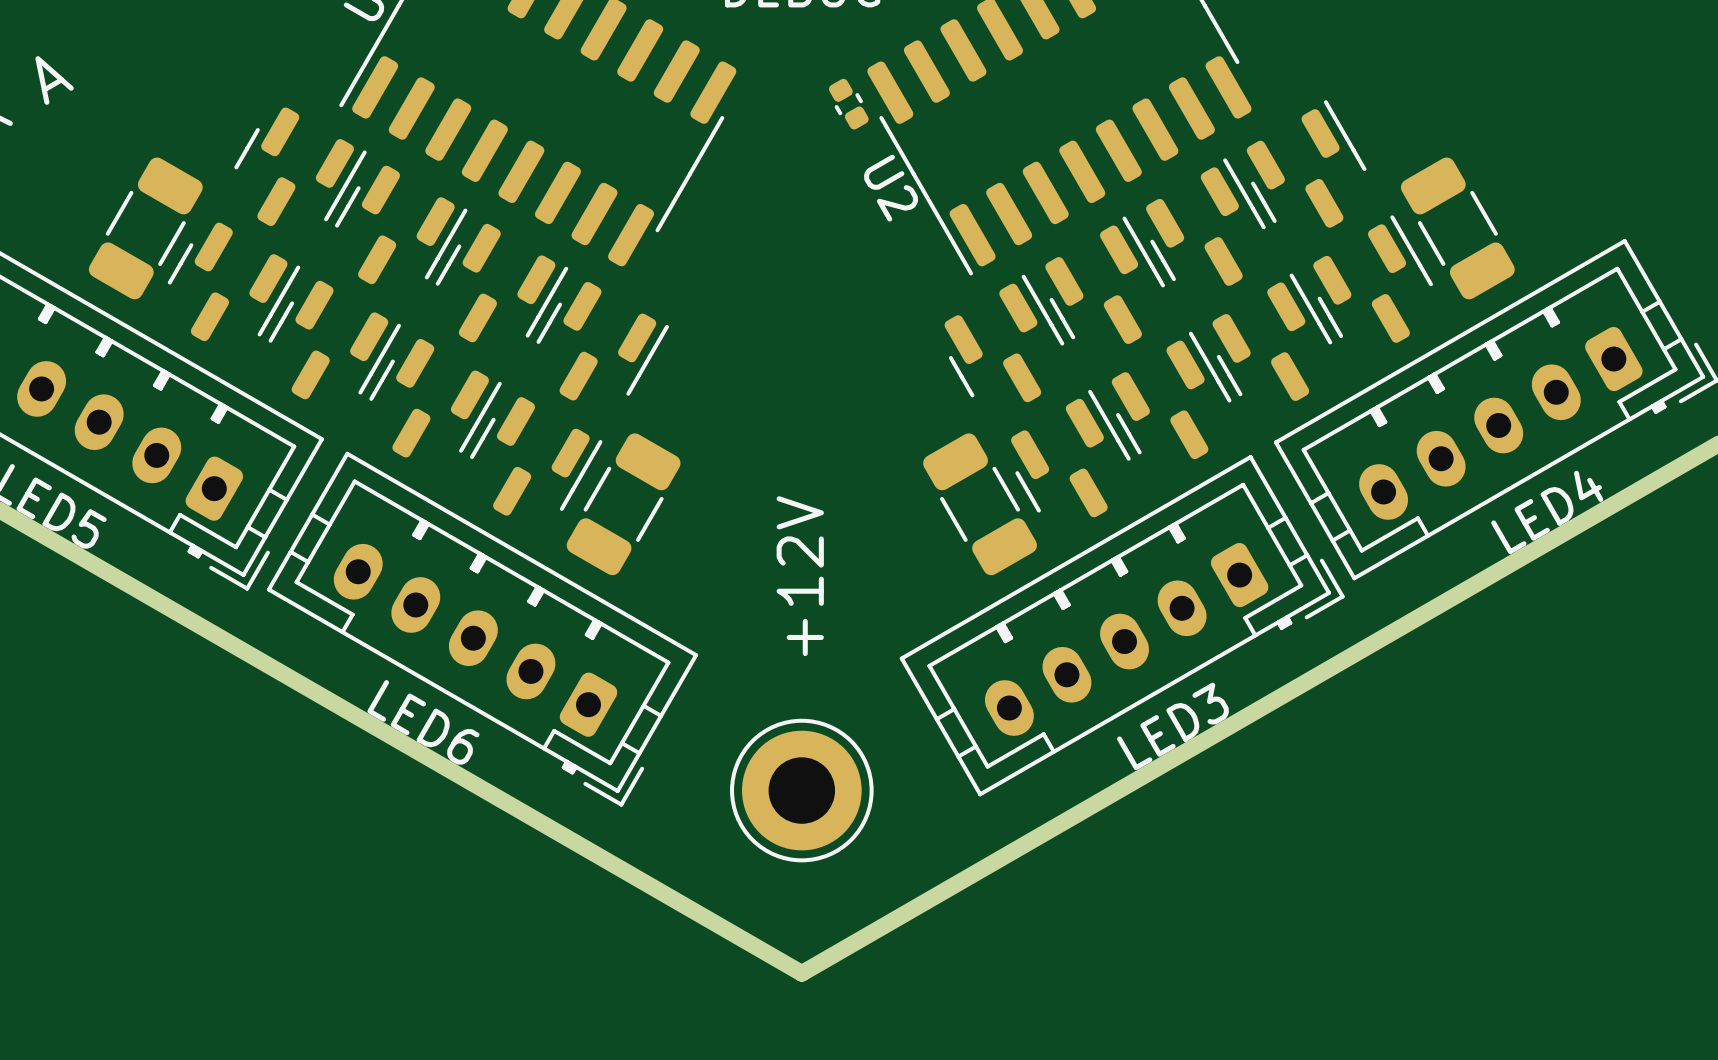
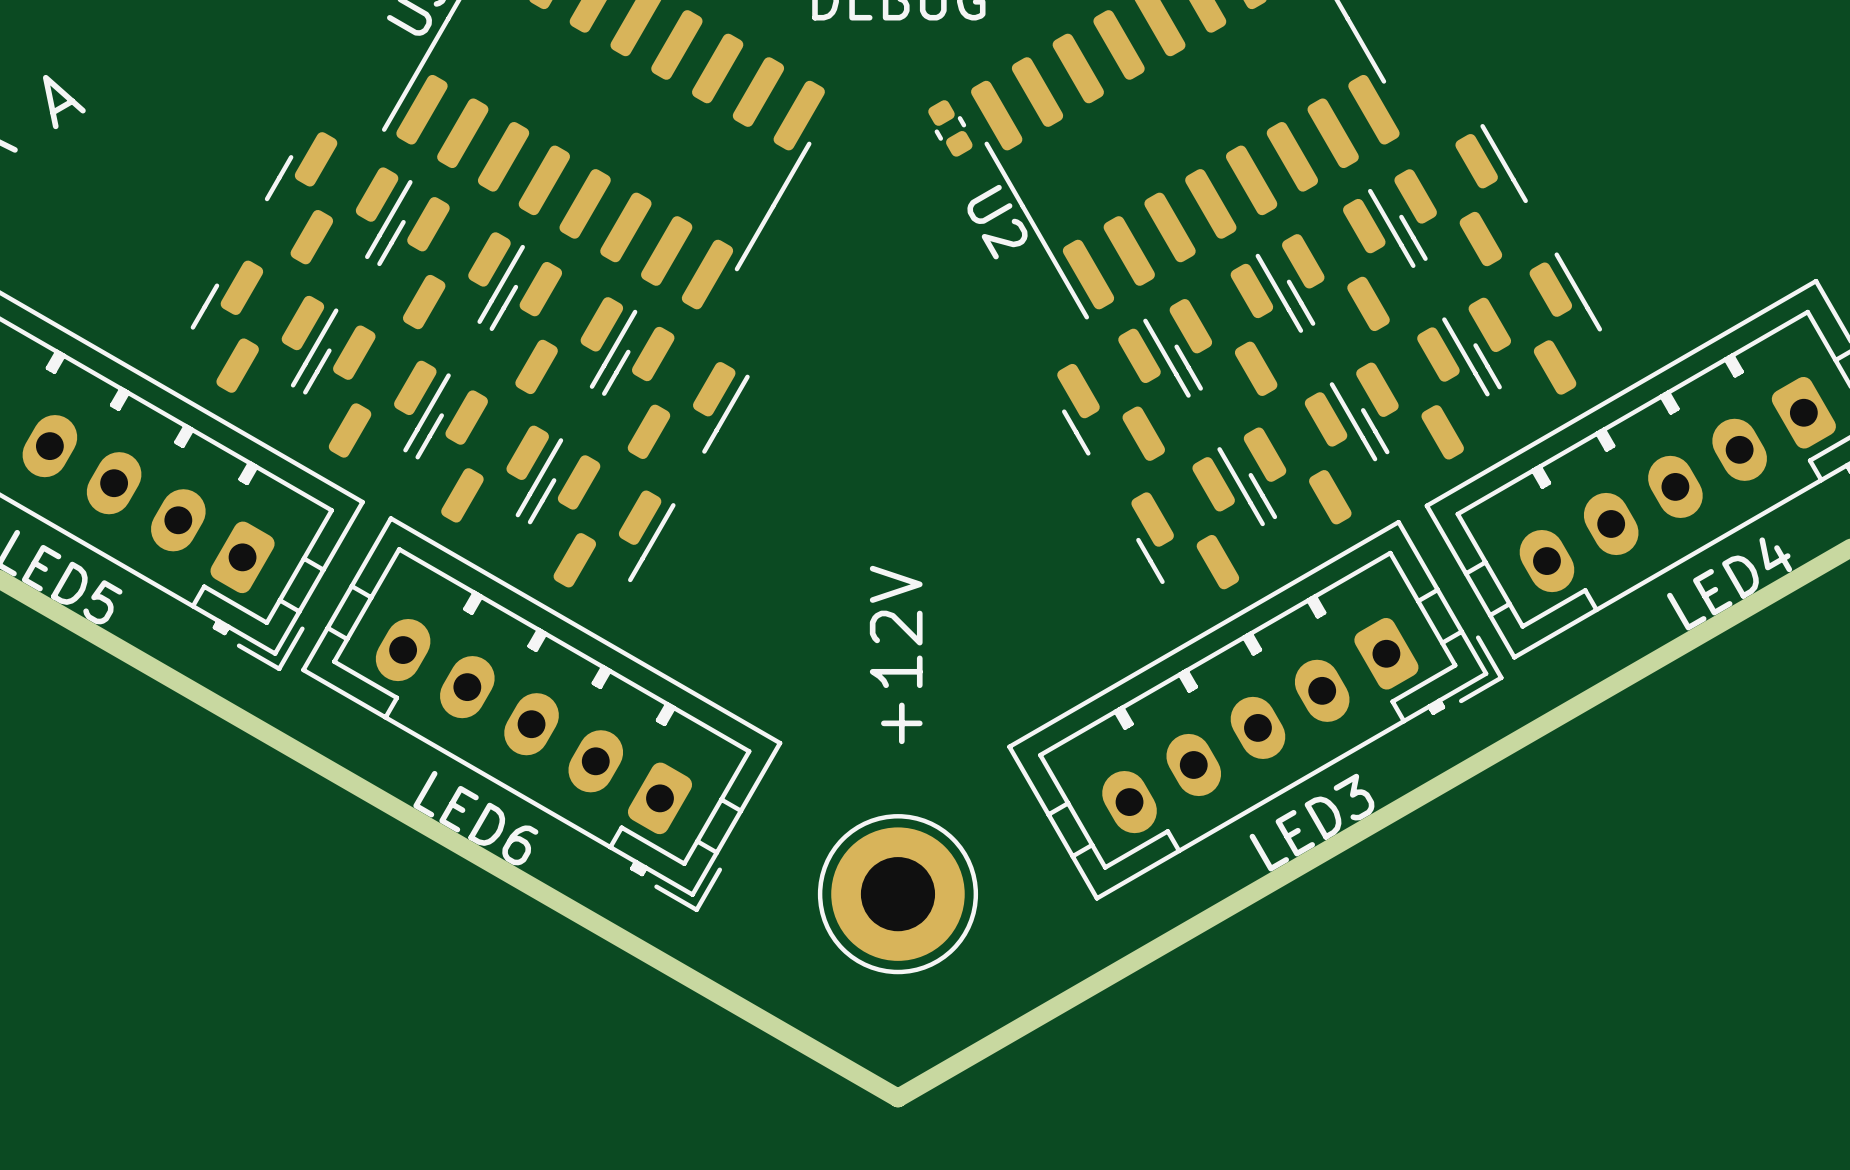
part: (145, 228) -> none
part: (1457, 228) -> none
part: (623, 504) -> none
part: (980, 504) -> none

